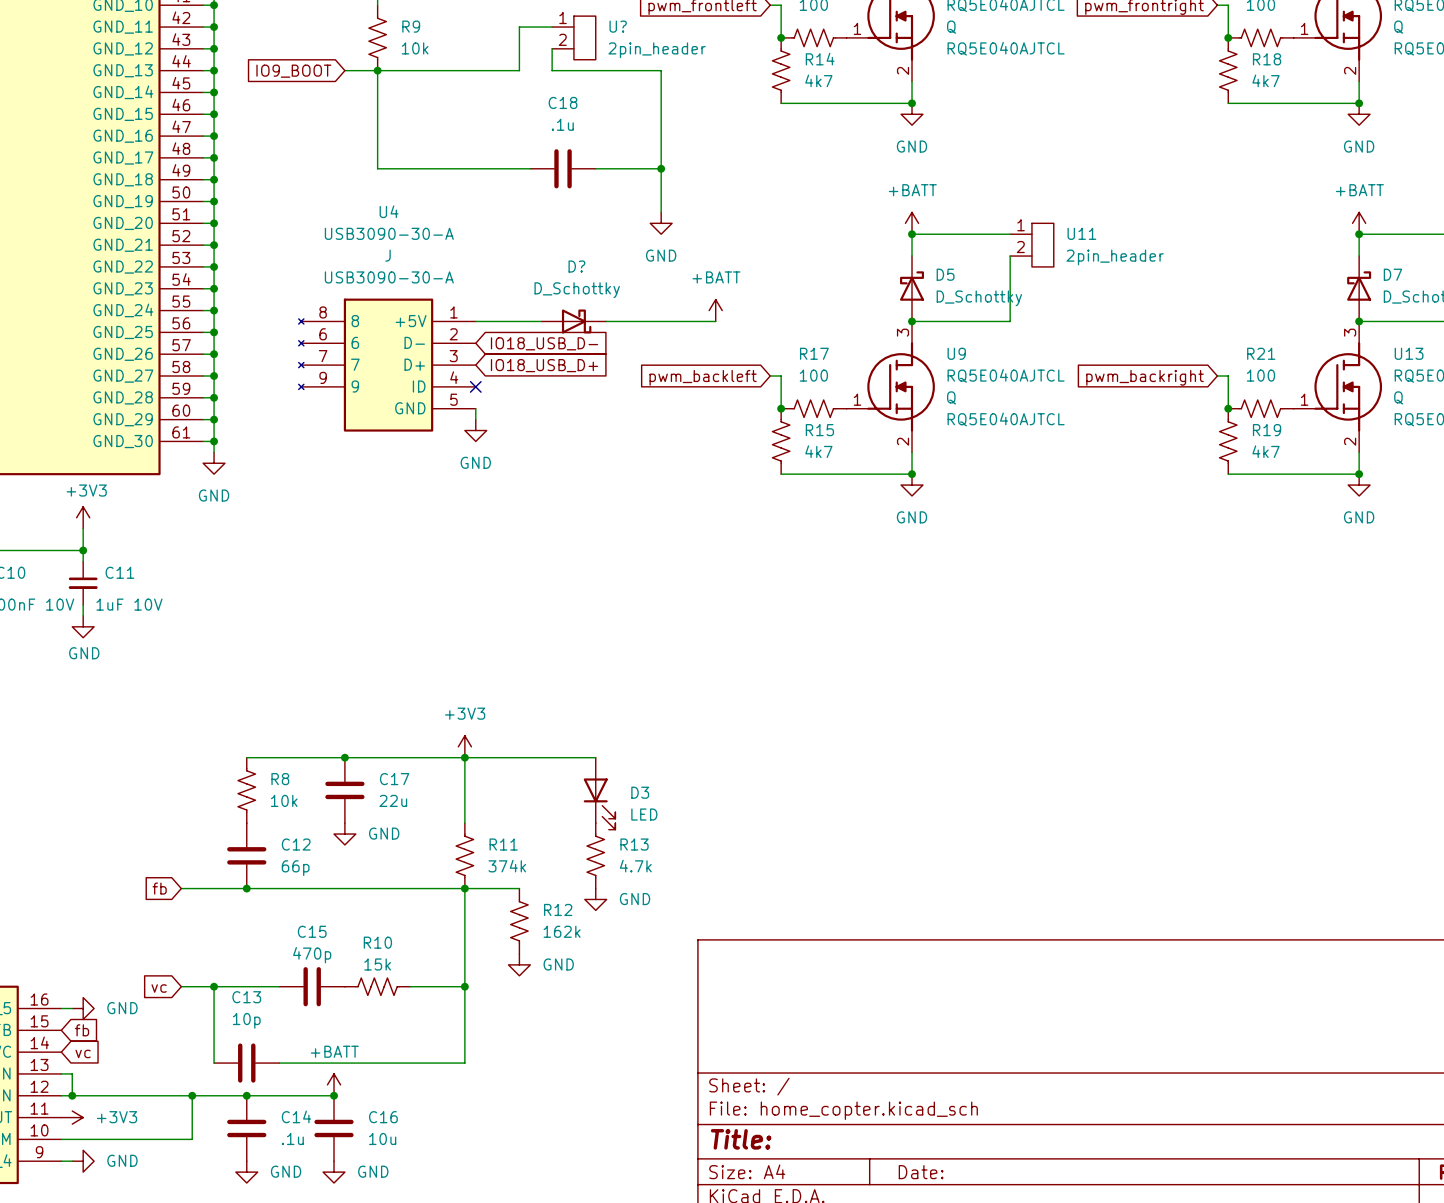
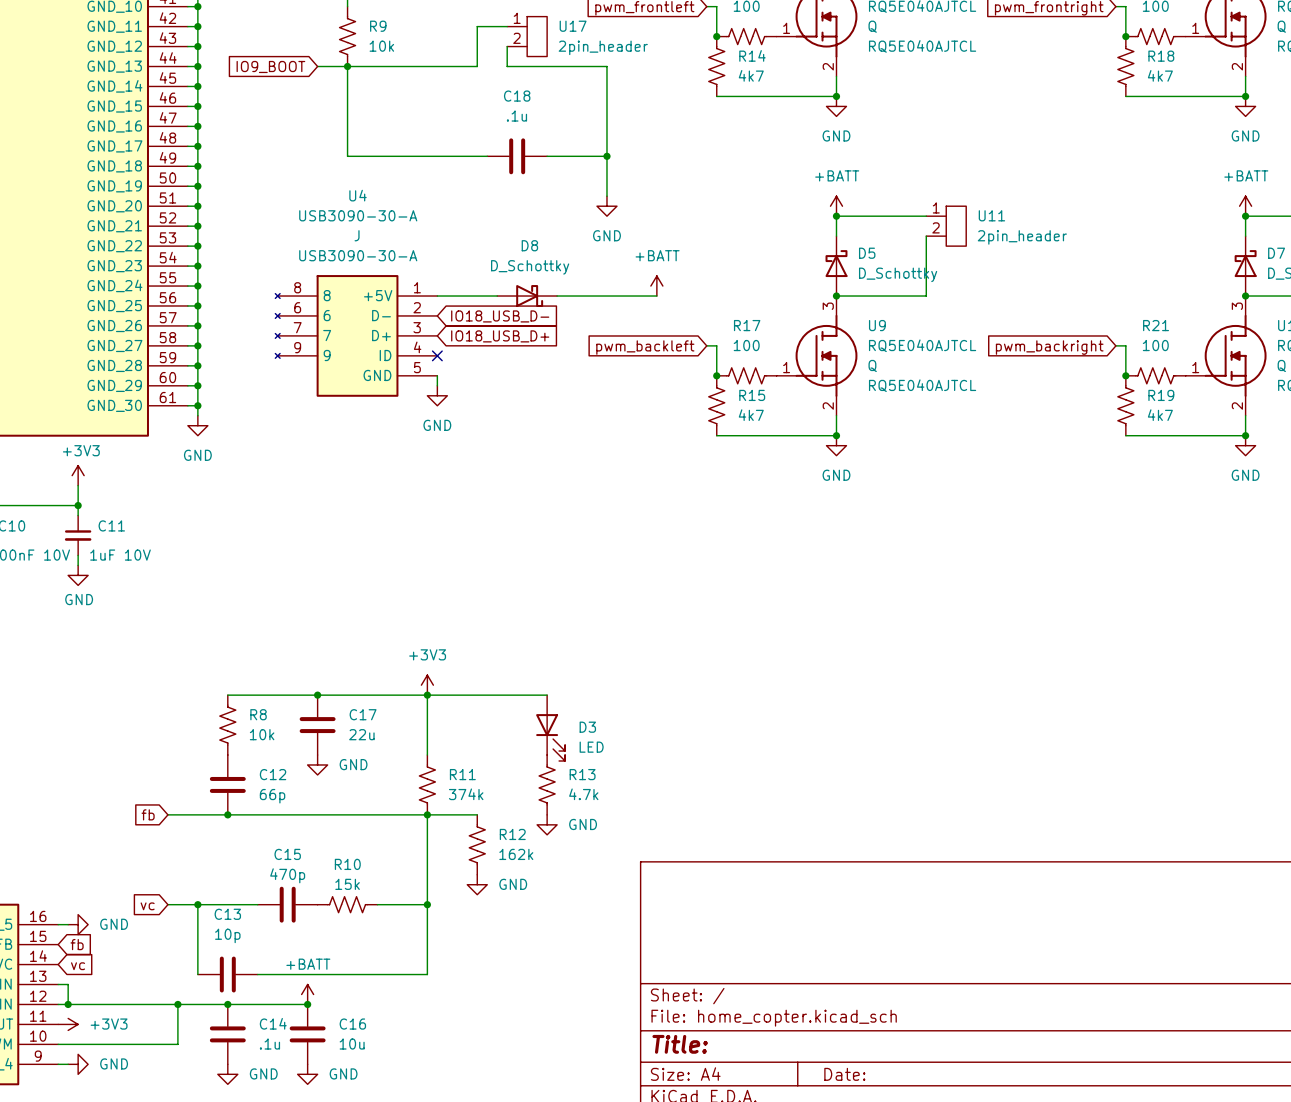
U? name: U? (618, 26) -> U17 (573, 26)
D? name: D? (576, 266) -> D8 (529, 245)

